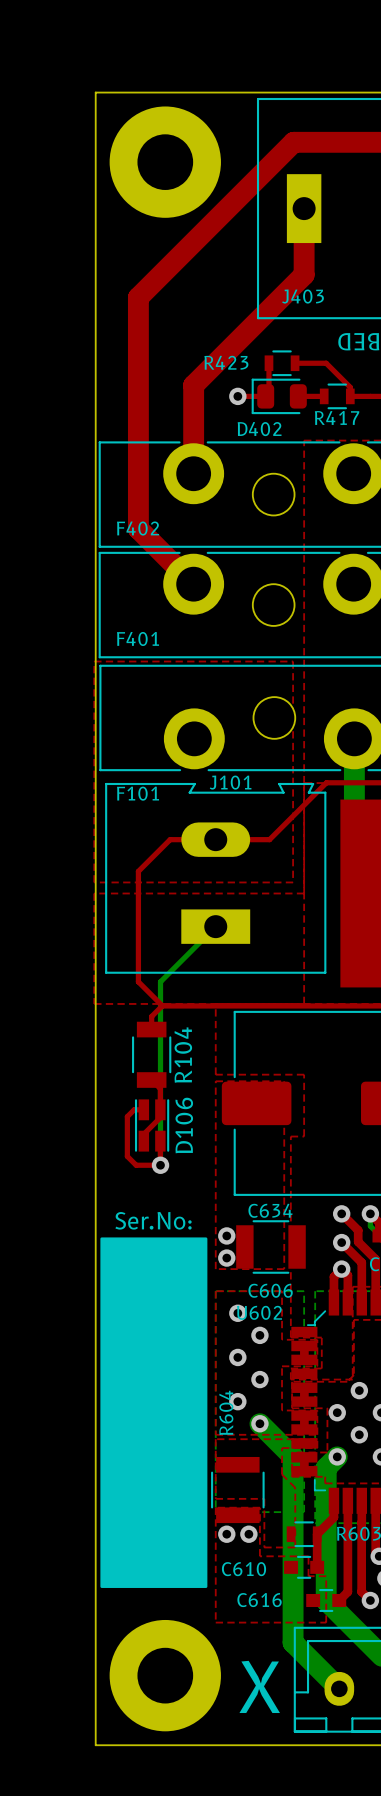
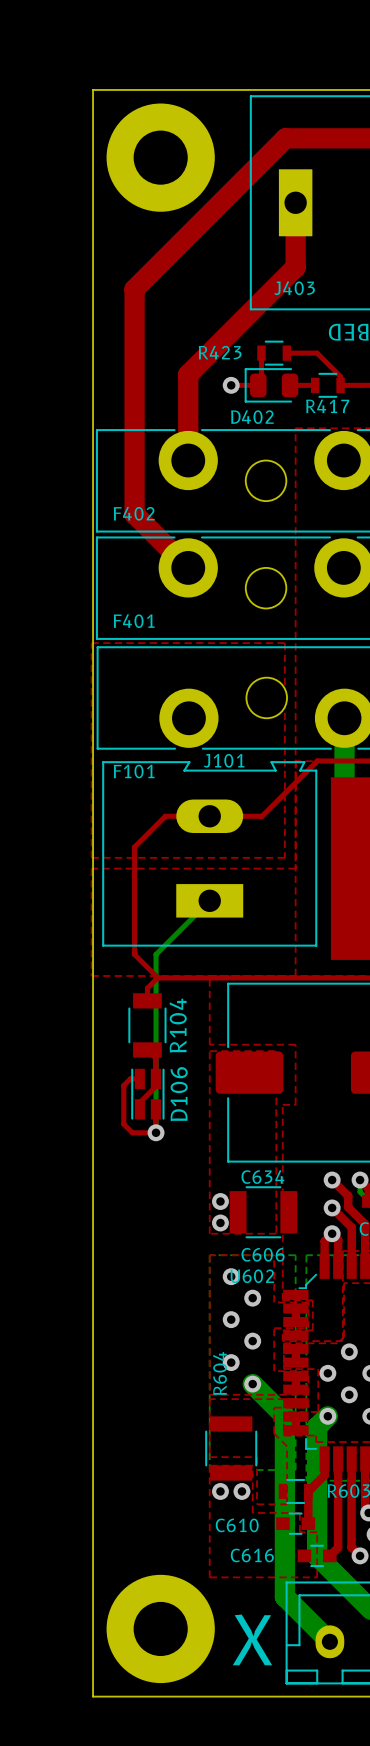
drawing: [100, 1237, 208, 1588] -> none

